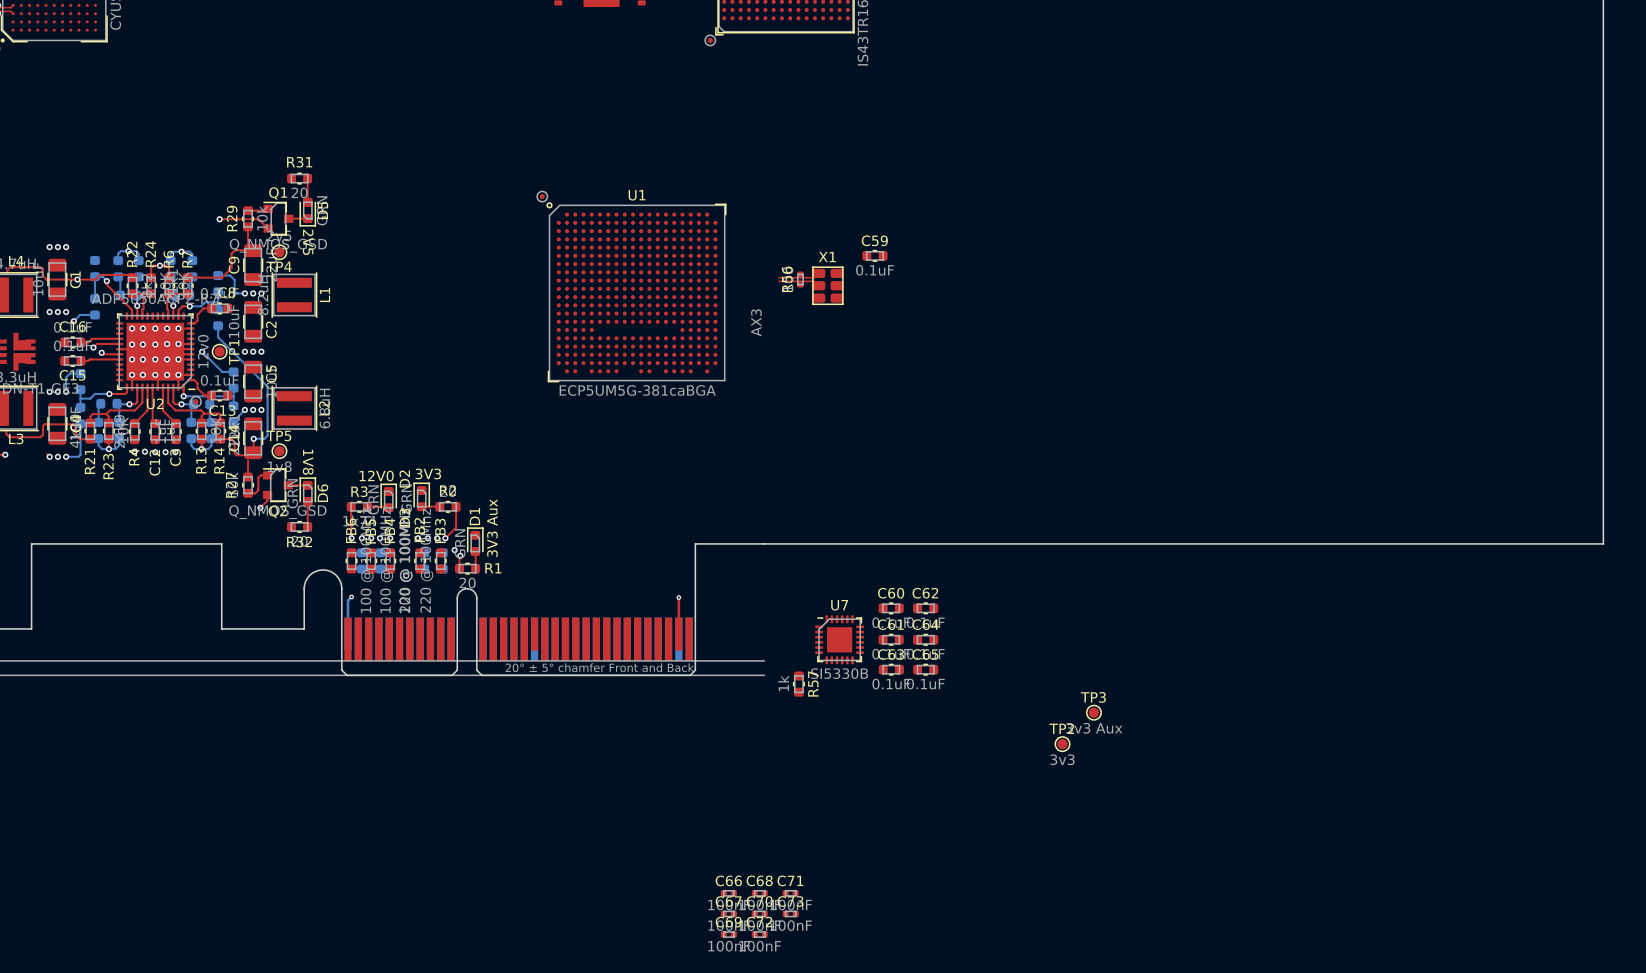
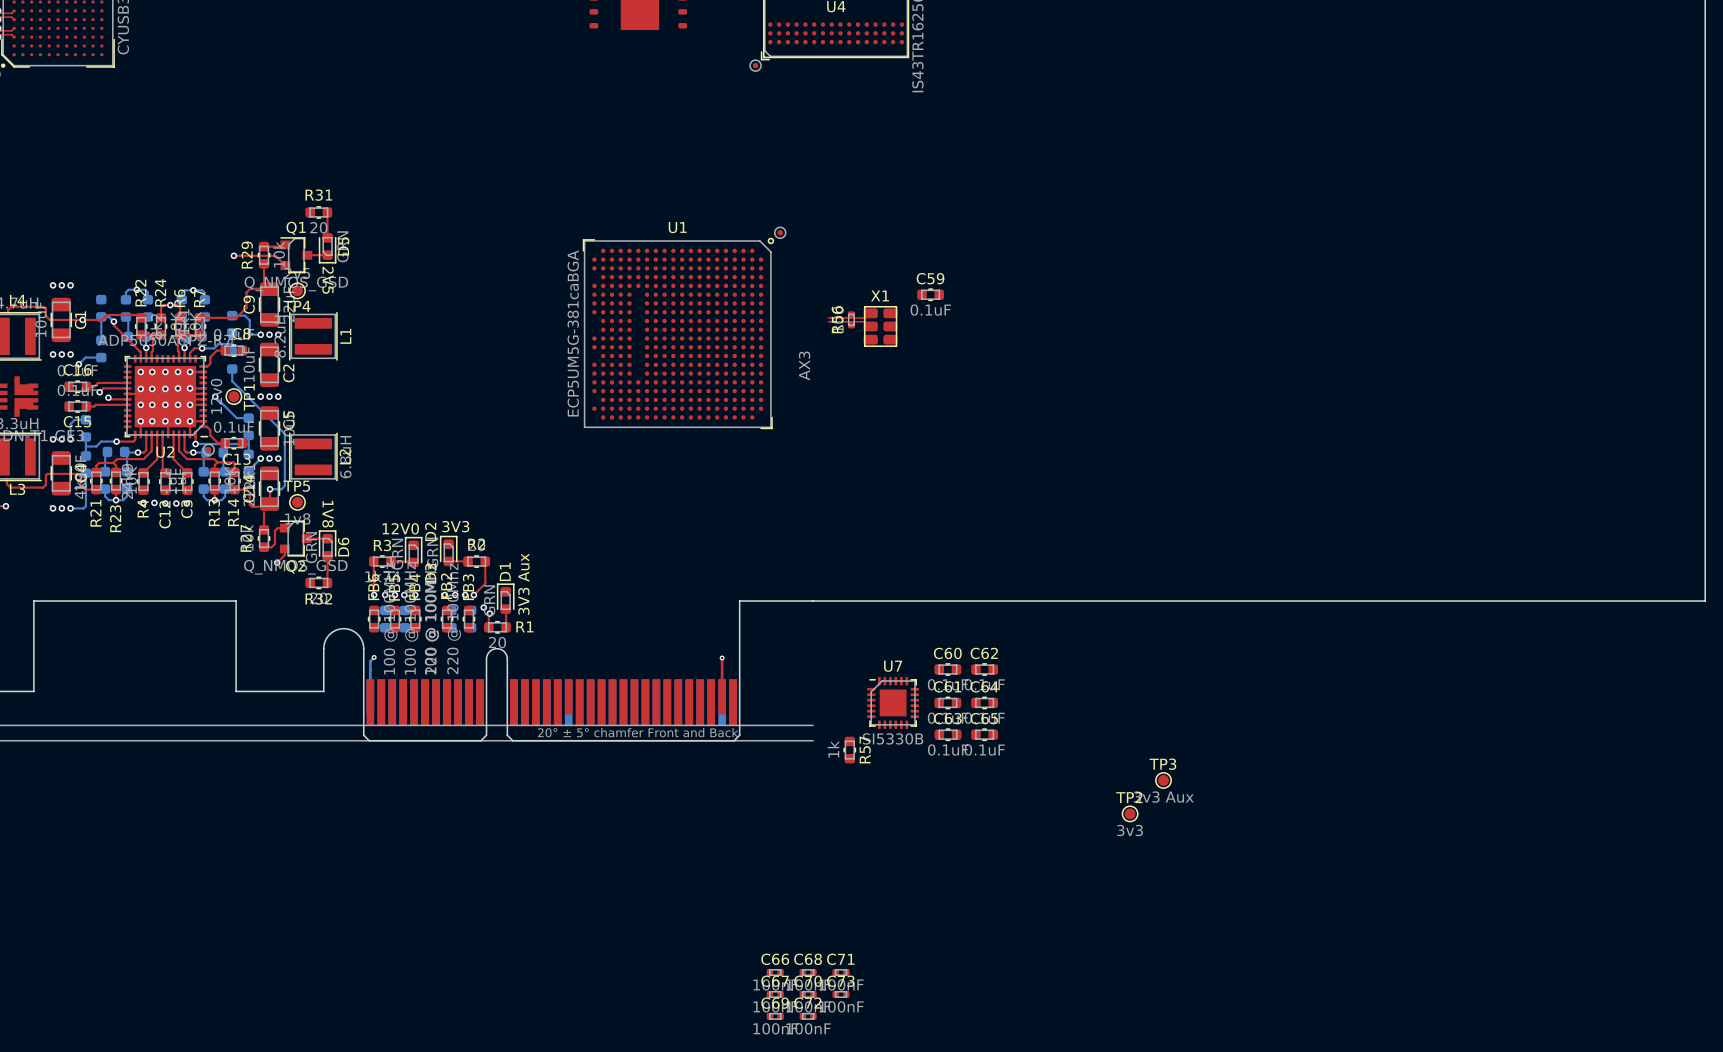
part position: (542, 196) -> (780, 232)
U1 rotation: 0° (636, 292) -> 90° clockwise (678, 333)

